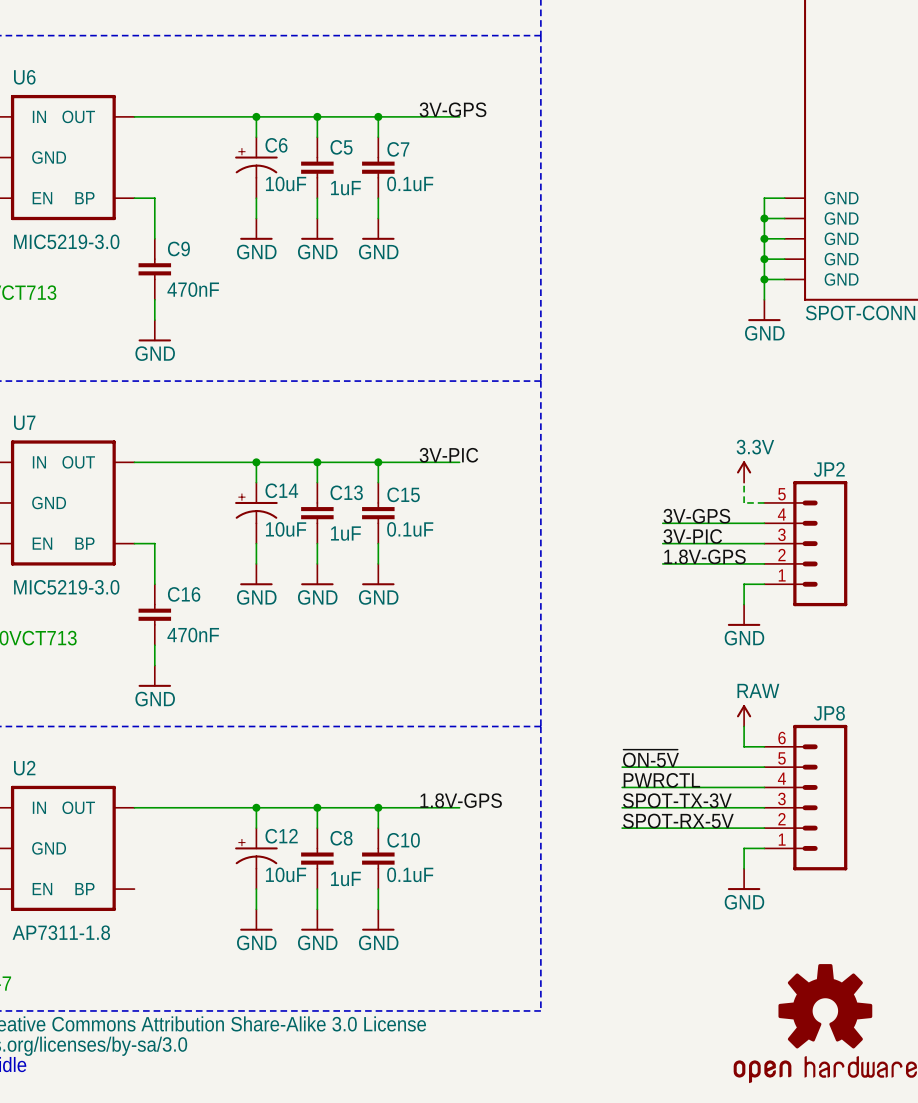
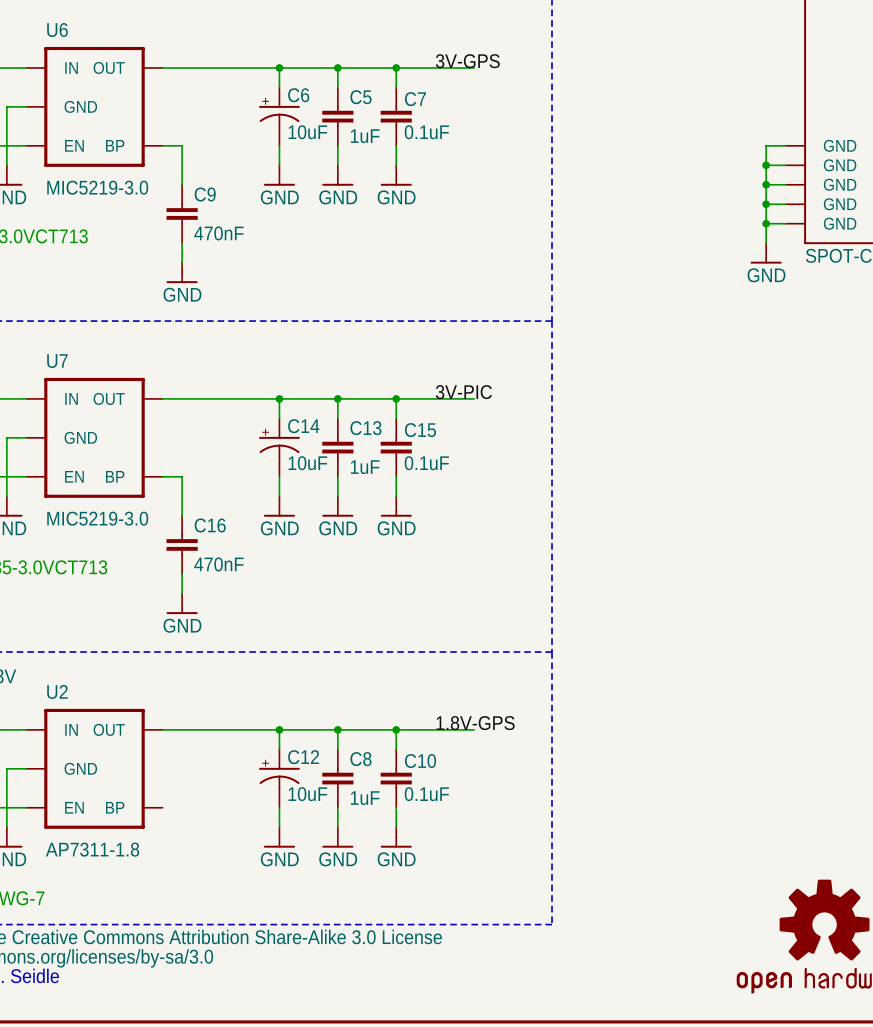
power symbol: 3.3V (744, 471) -> none
wire: (744, 482) (744, 502) (764, 502) -> none
label: 3V-GPS (696, 516) -> none
wire: (662, 523) (764, 523) -> none
label: 3V-PIC (692, 536) -> none
wire: (662, 543) (764, 543) -> none
JP2: (805, 543) -> none
label: 1.8V-GPS (704, 556) -> none
wire: (662, 563) (764, 563) -> none
wire: (764, 584) (744, 584) (744, 604) -> none
power symbol: GND (744, 615) -> none
power symbol: RAW (744, 715) -> none
wire: (744, 726) (744, 746) (764, 746) -> none
label: ~{ON-5V} (651, 758) -> none
wire: (622, 767) (764, 767) -> none
label: PWRCTL (661, 780) -> none
wire: (622, 787) (764, 787) -> none
JP8: (805, 797) -> none
label: SPOT-TX-3V (677, 800) -> none
wire: (622, 807) (764, 807) -> none
label: SPOT-RX-5V (678, 820) -> none
wire: (622, 828) (764, 828) -> none
wire: (764, 848) (744, 848) (744, 868) -> none
power symbol: GND (744, 879) -> none

